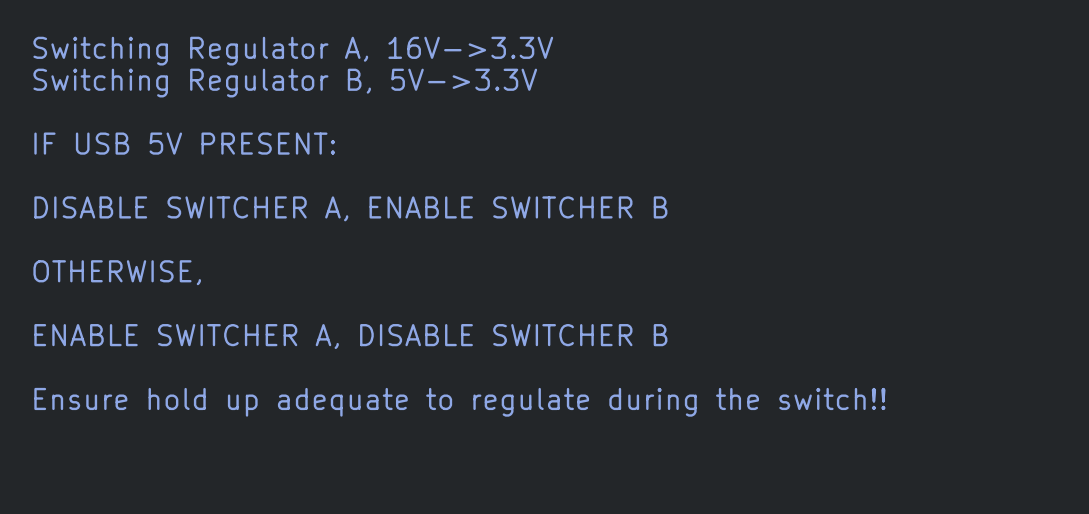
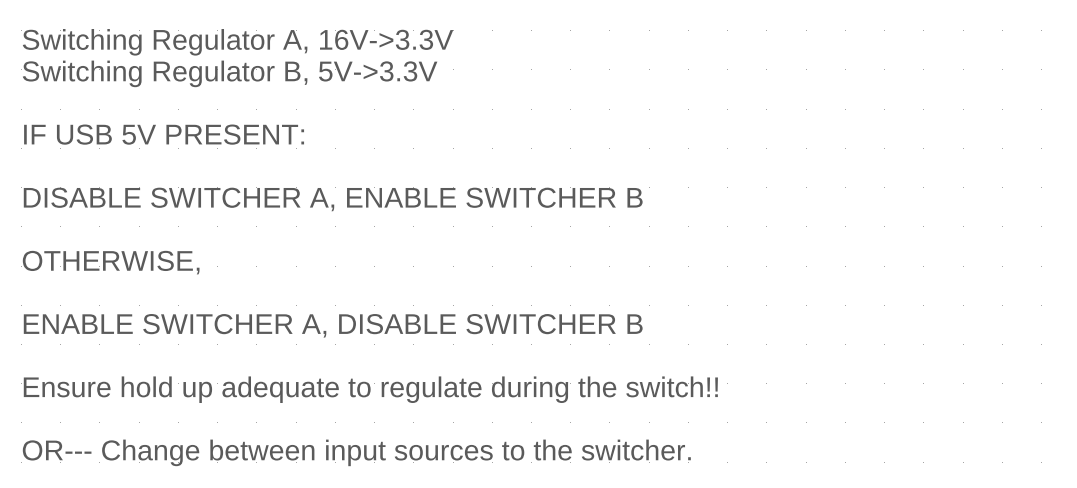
text: none -> OR--- Change between input sources to the switcher. (356, 452)

